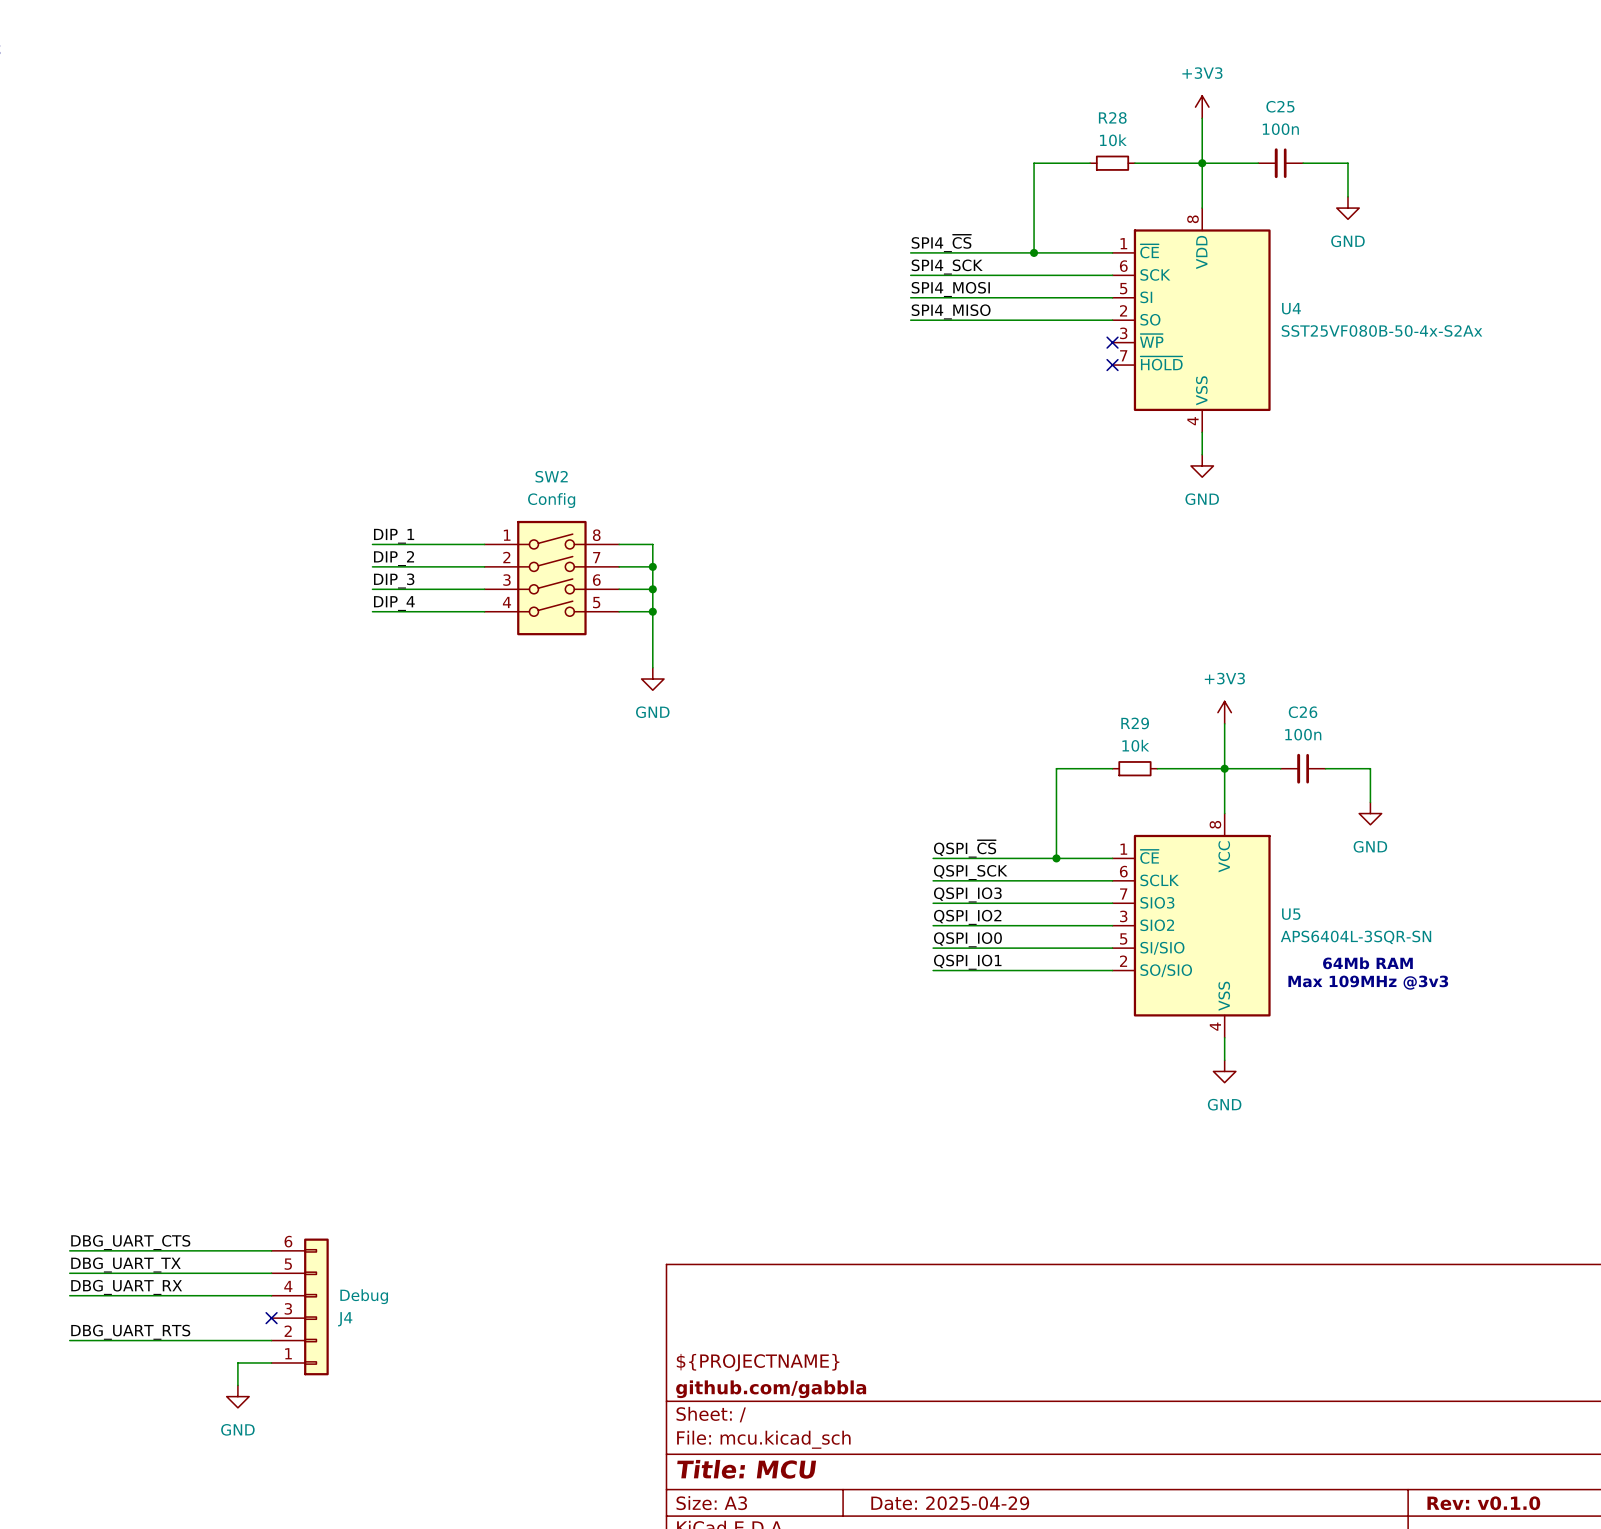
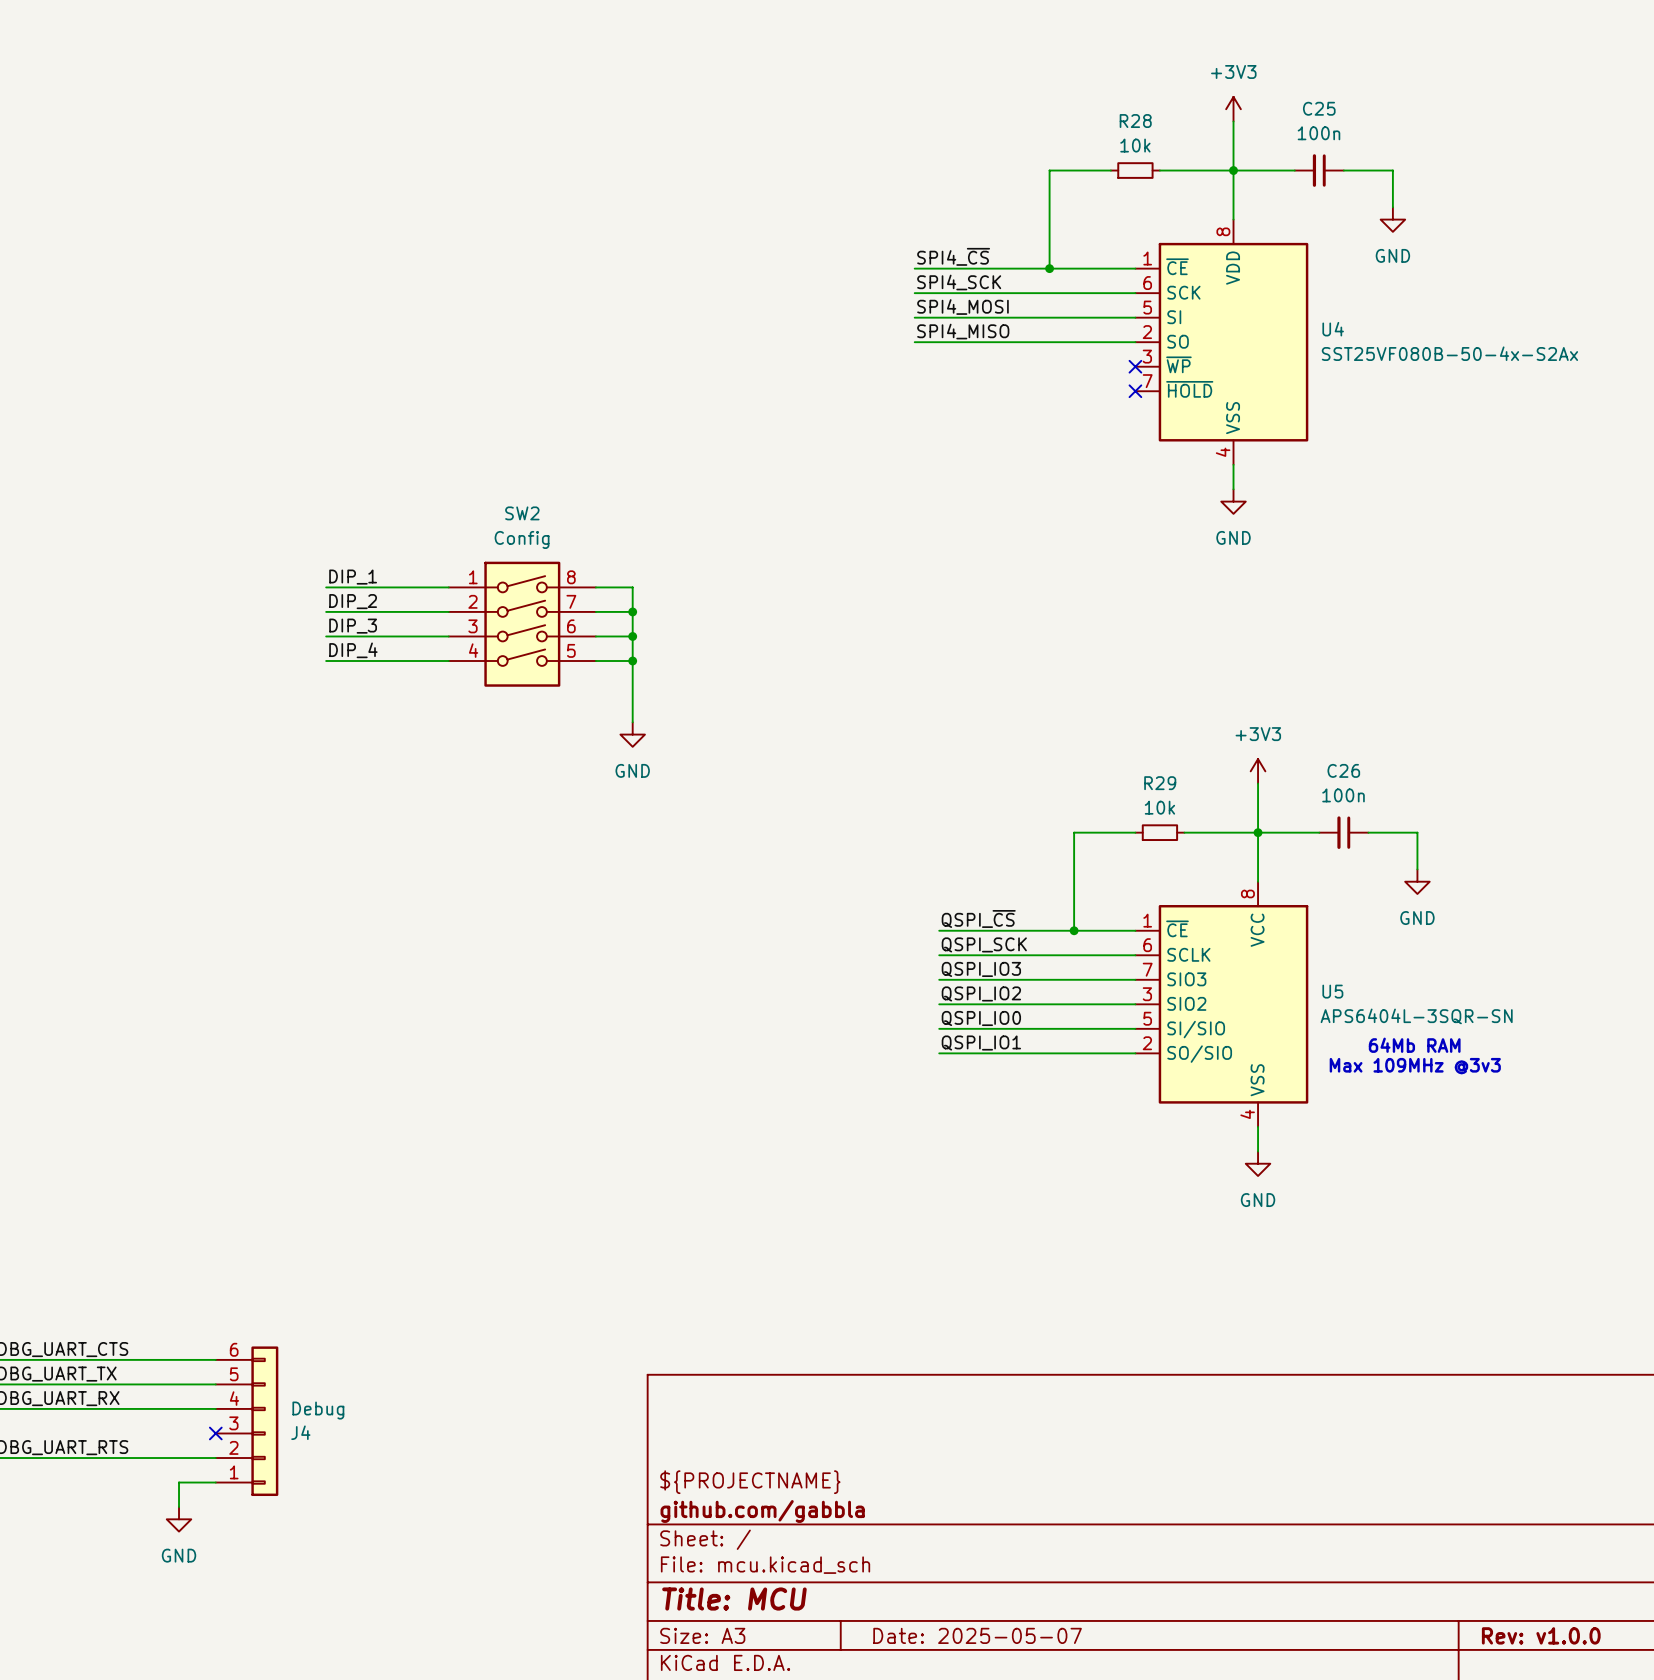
title block: Date: 2025-04-29 (950, 1503) -> Date: 2025-05-07 (977, 1635)
title block: Rev: v0.1.0 (1483, 1503) -> Rev: v1.0.0 (1541, 1635)

